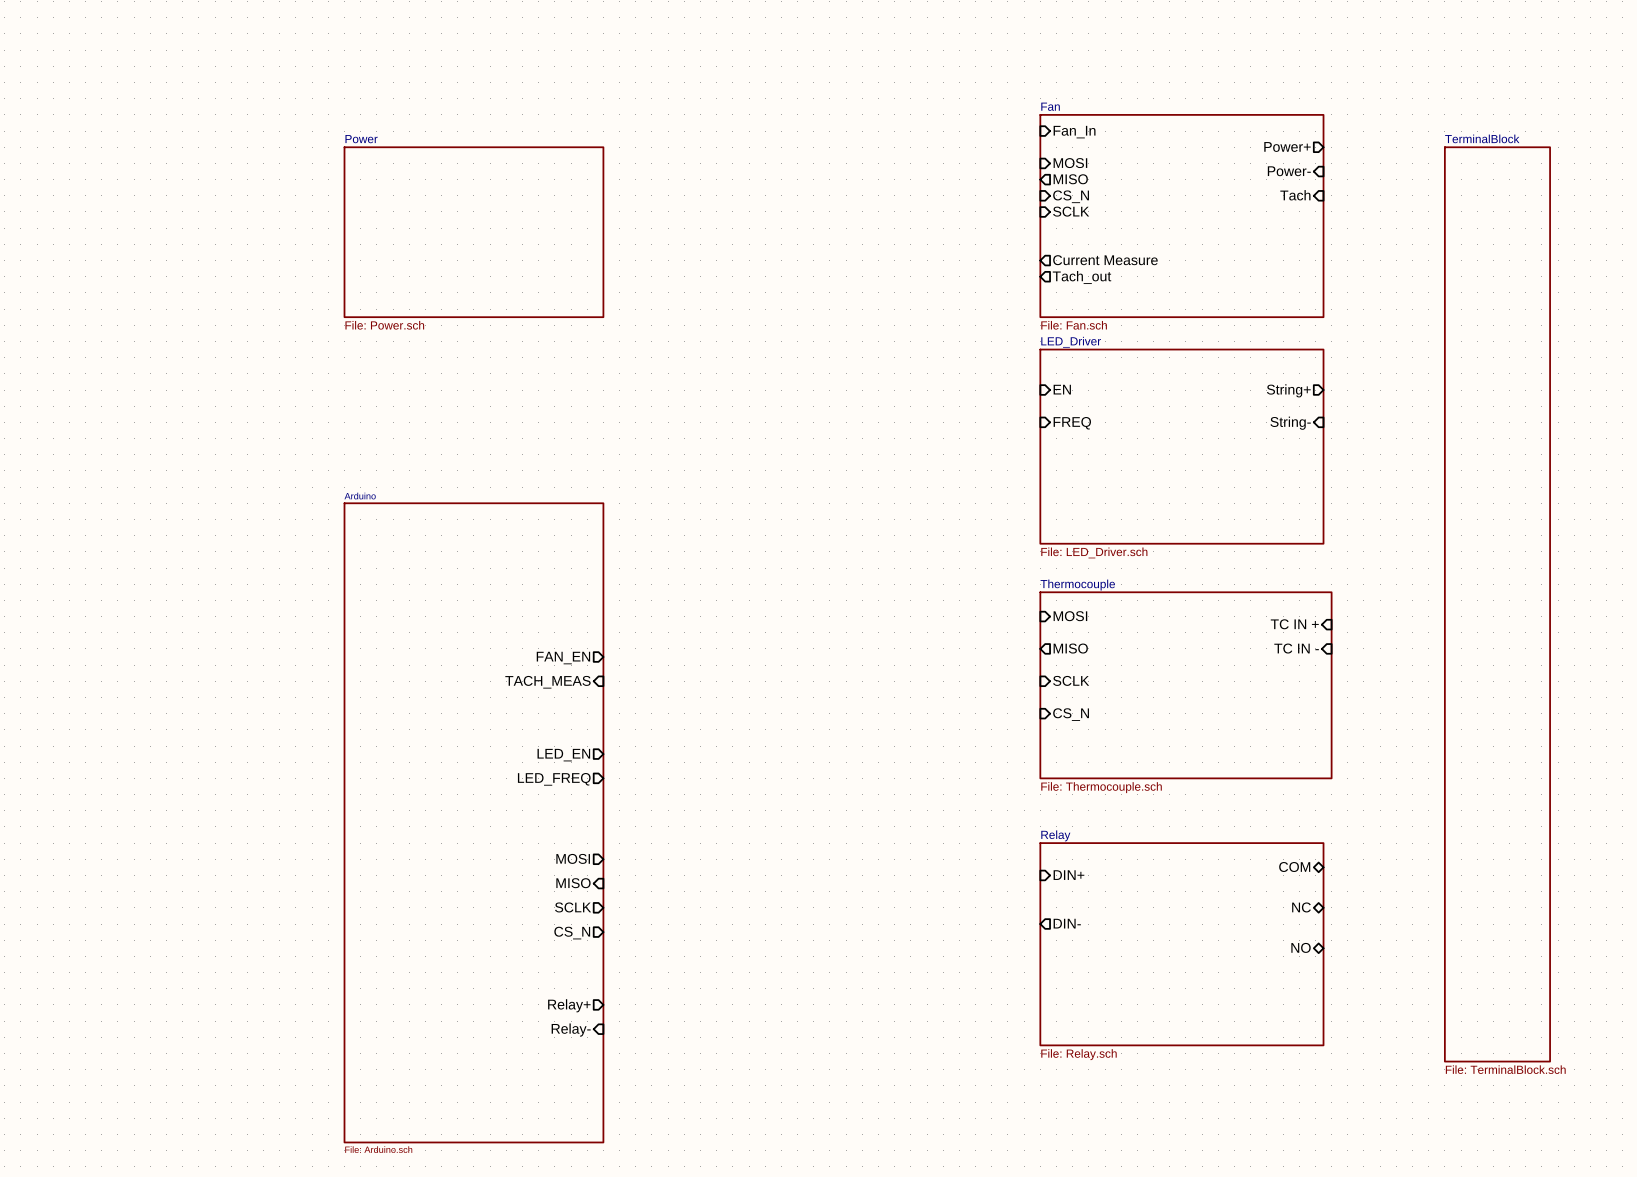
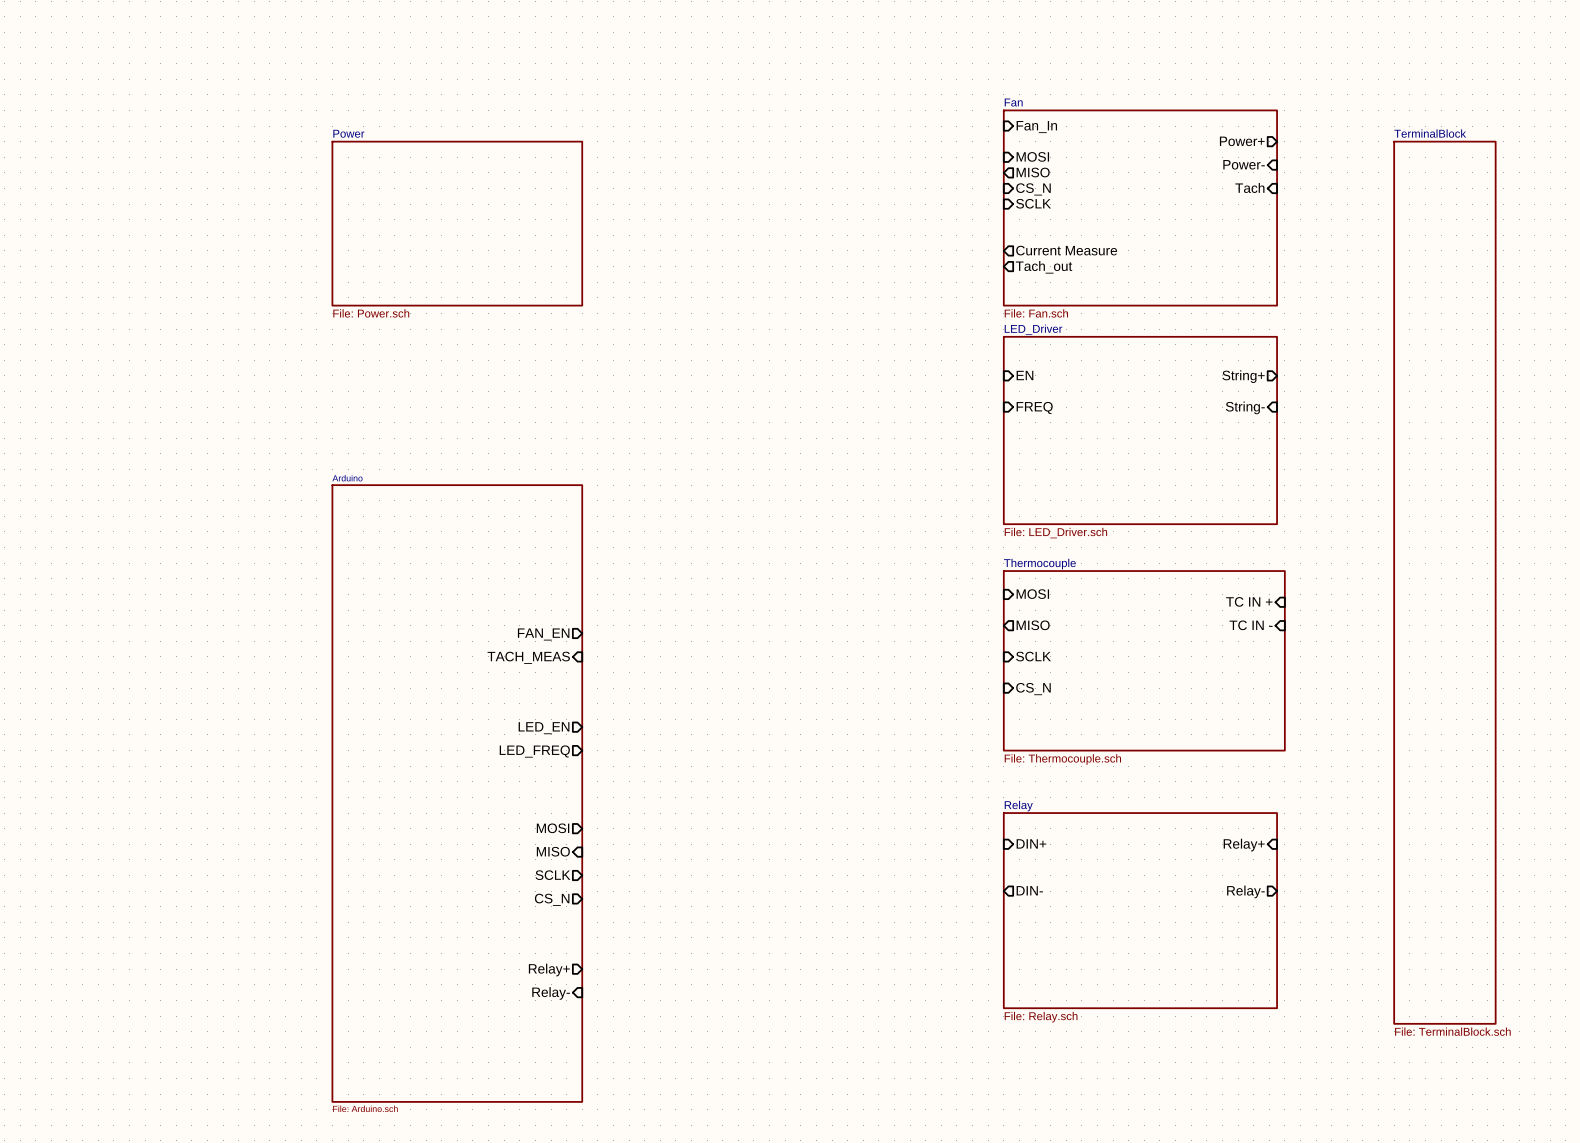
sheet pin: COM (1294, 867) -> none
sheet pin: none -> Relay+ (1244, 845)
sheet pin: NC (1301, 907) -> none
sheet pin: none -> Relay- (1245, 891)
sheet pin: NO (1301, 947) -> none

